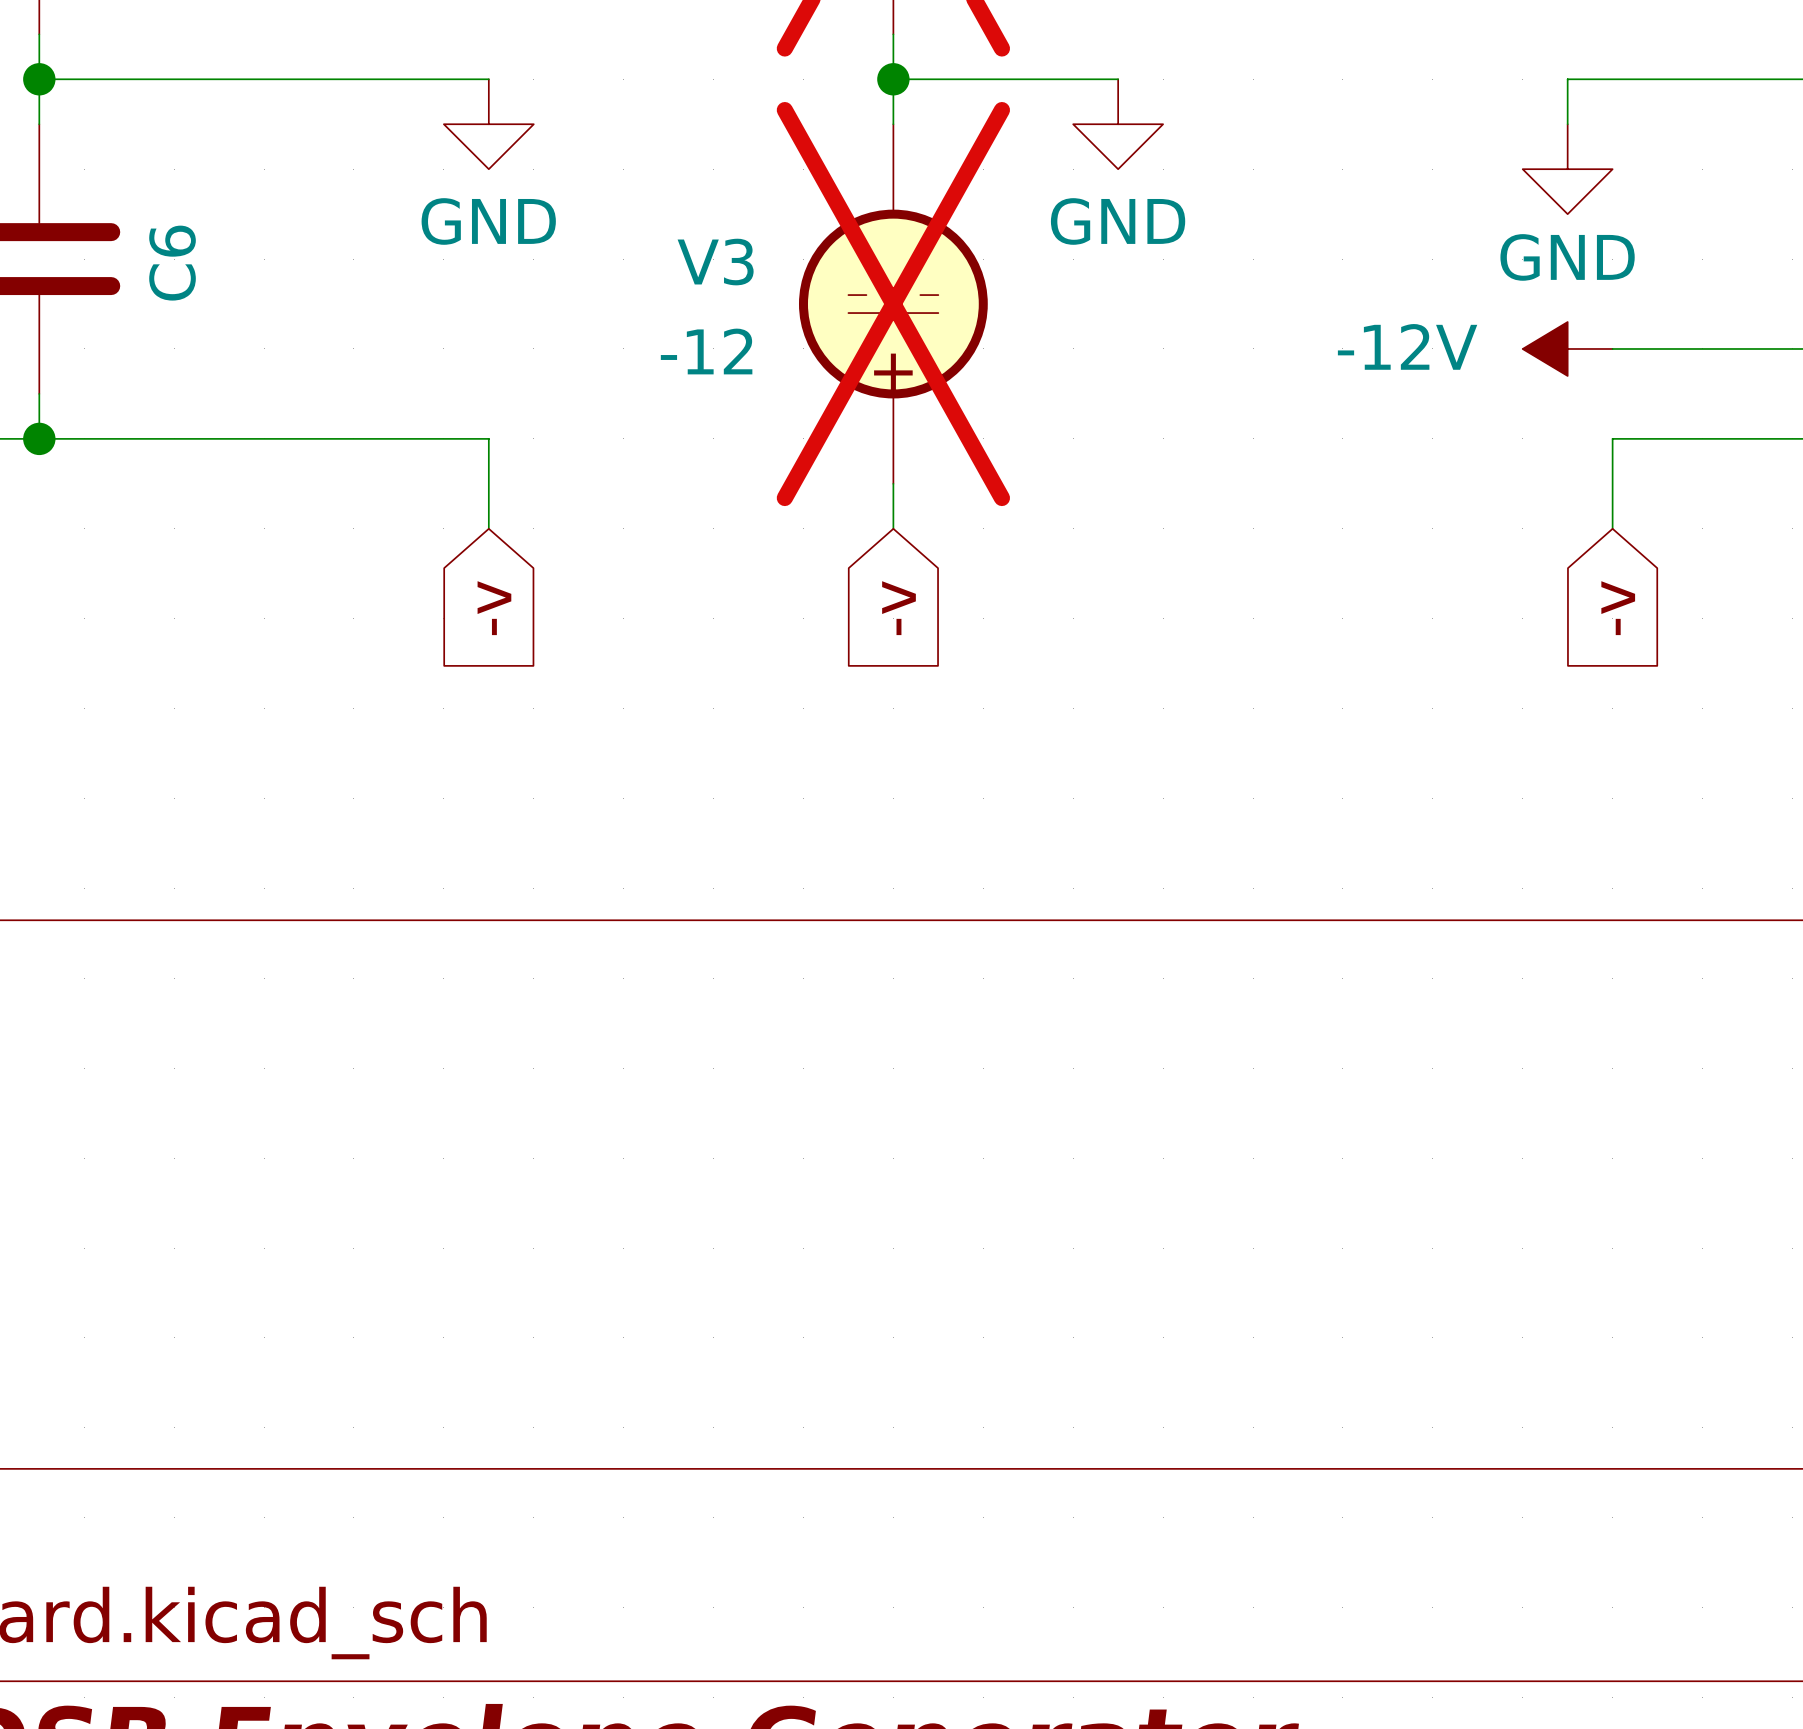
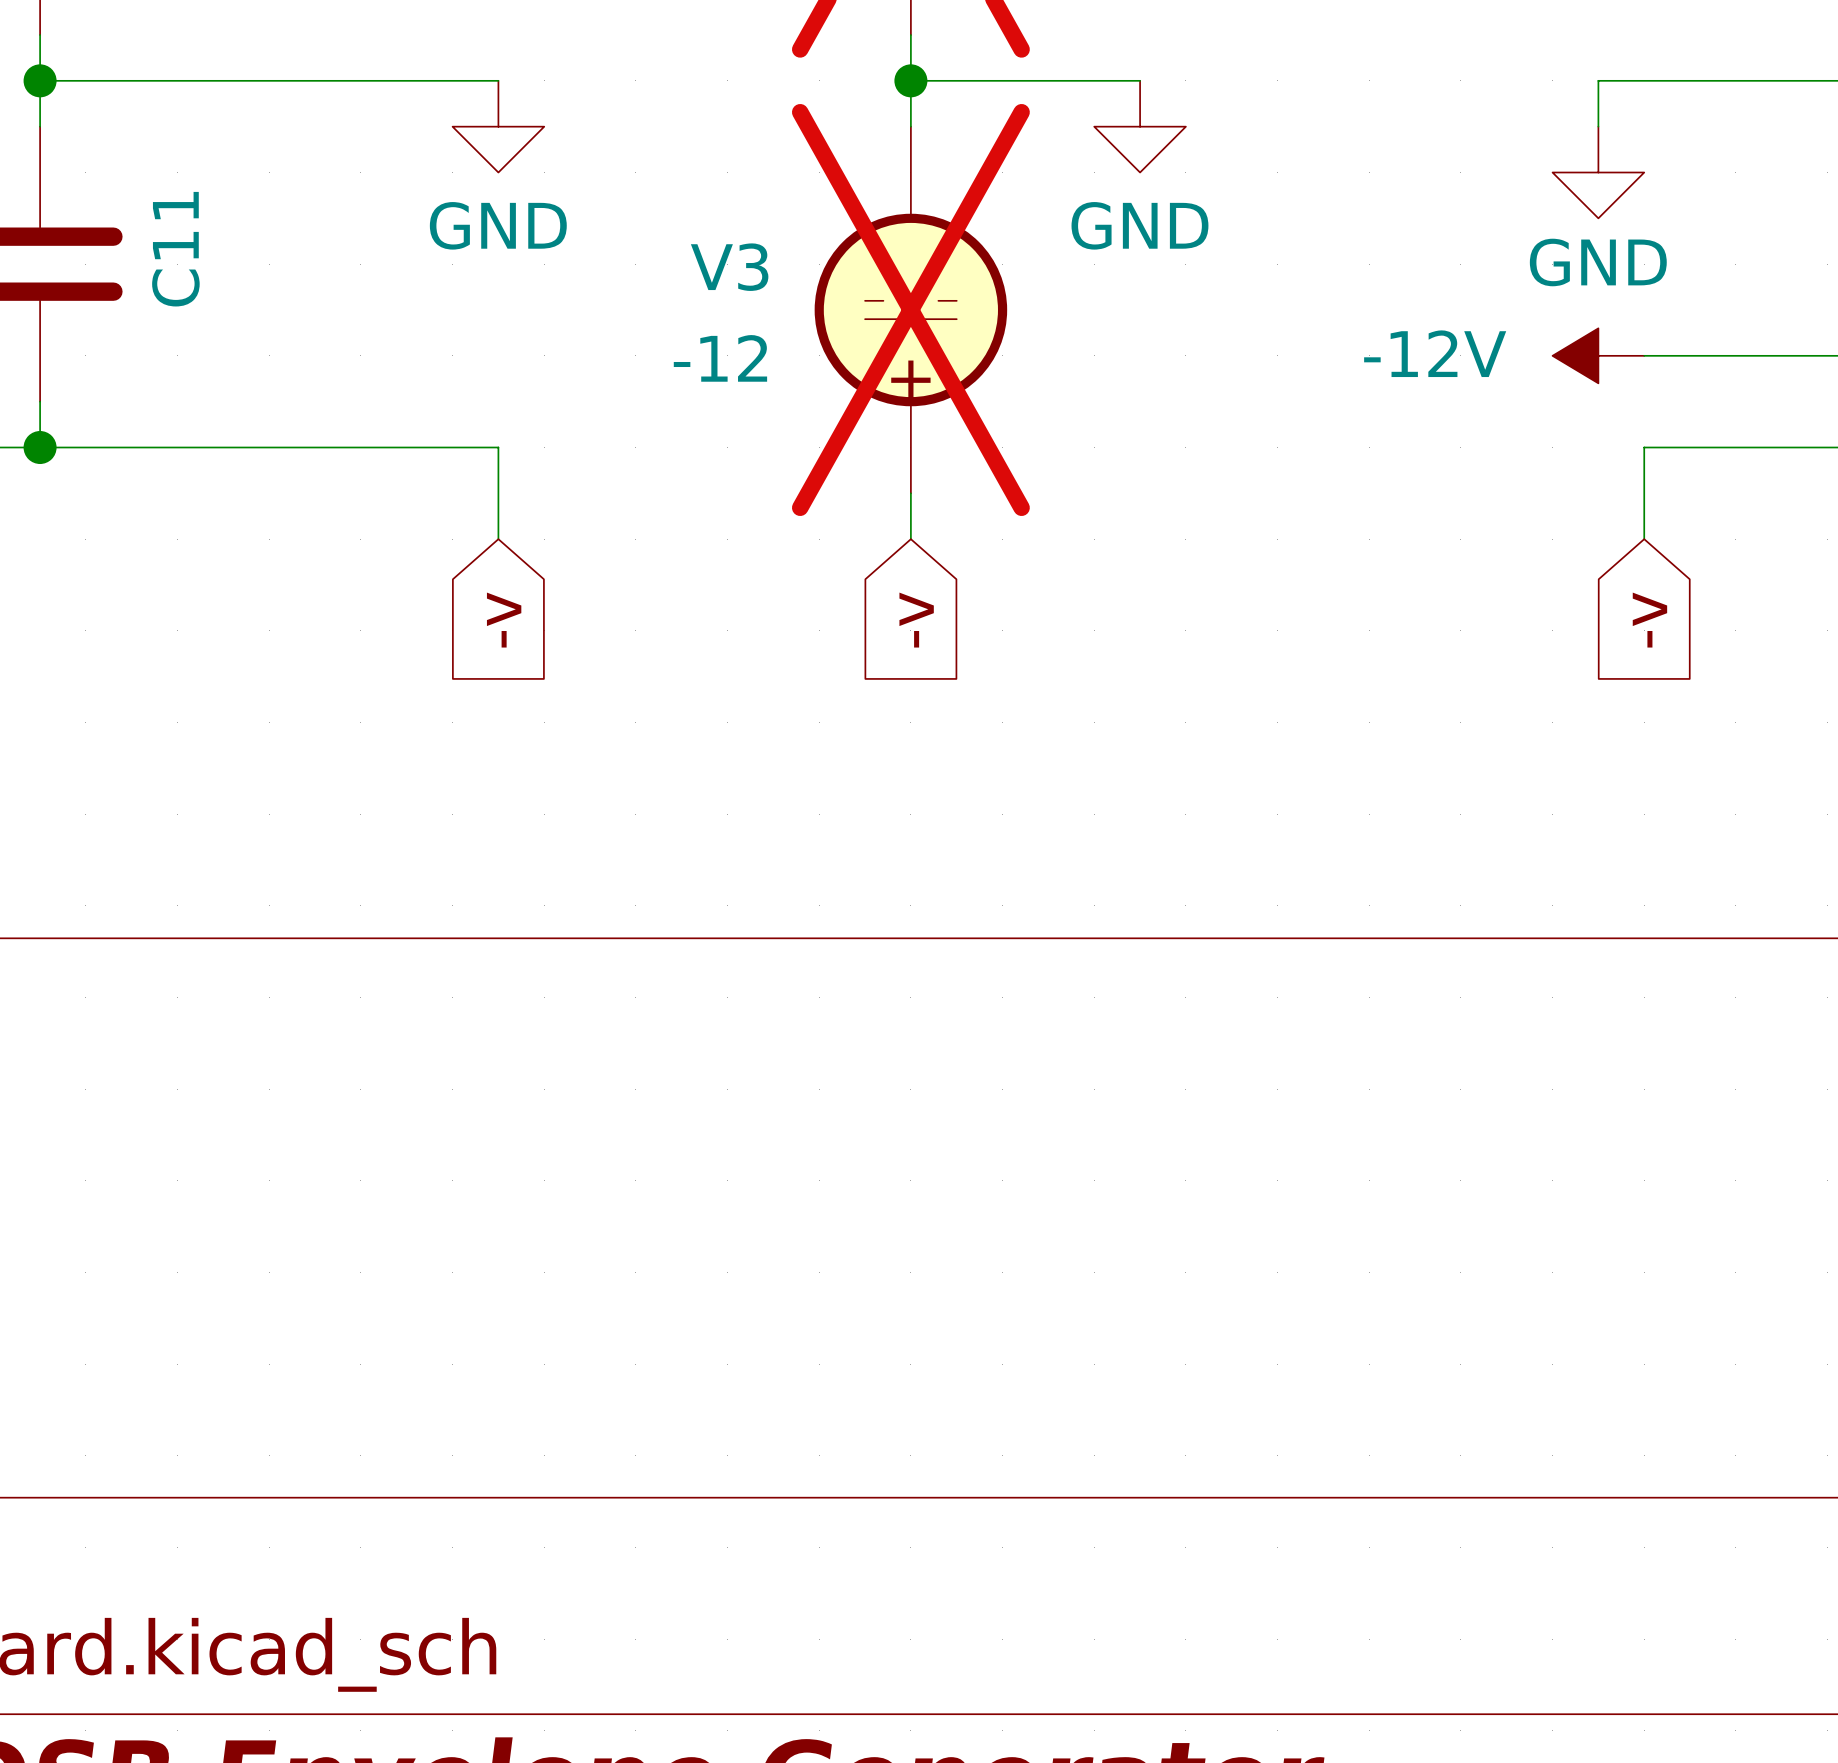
C6 name: C6 (172, 263) -> C11 (175, 249)

